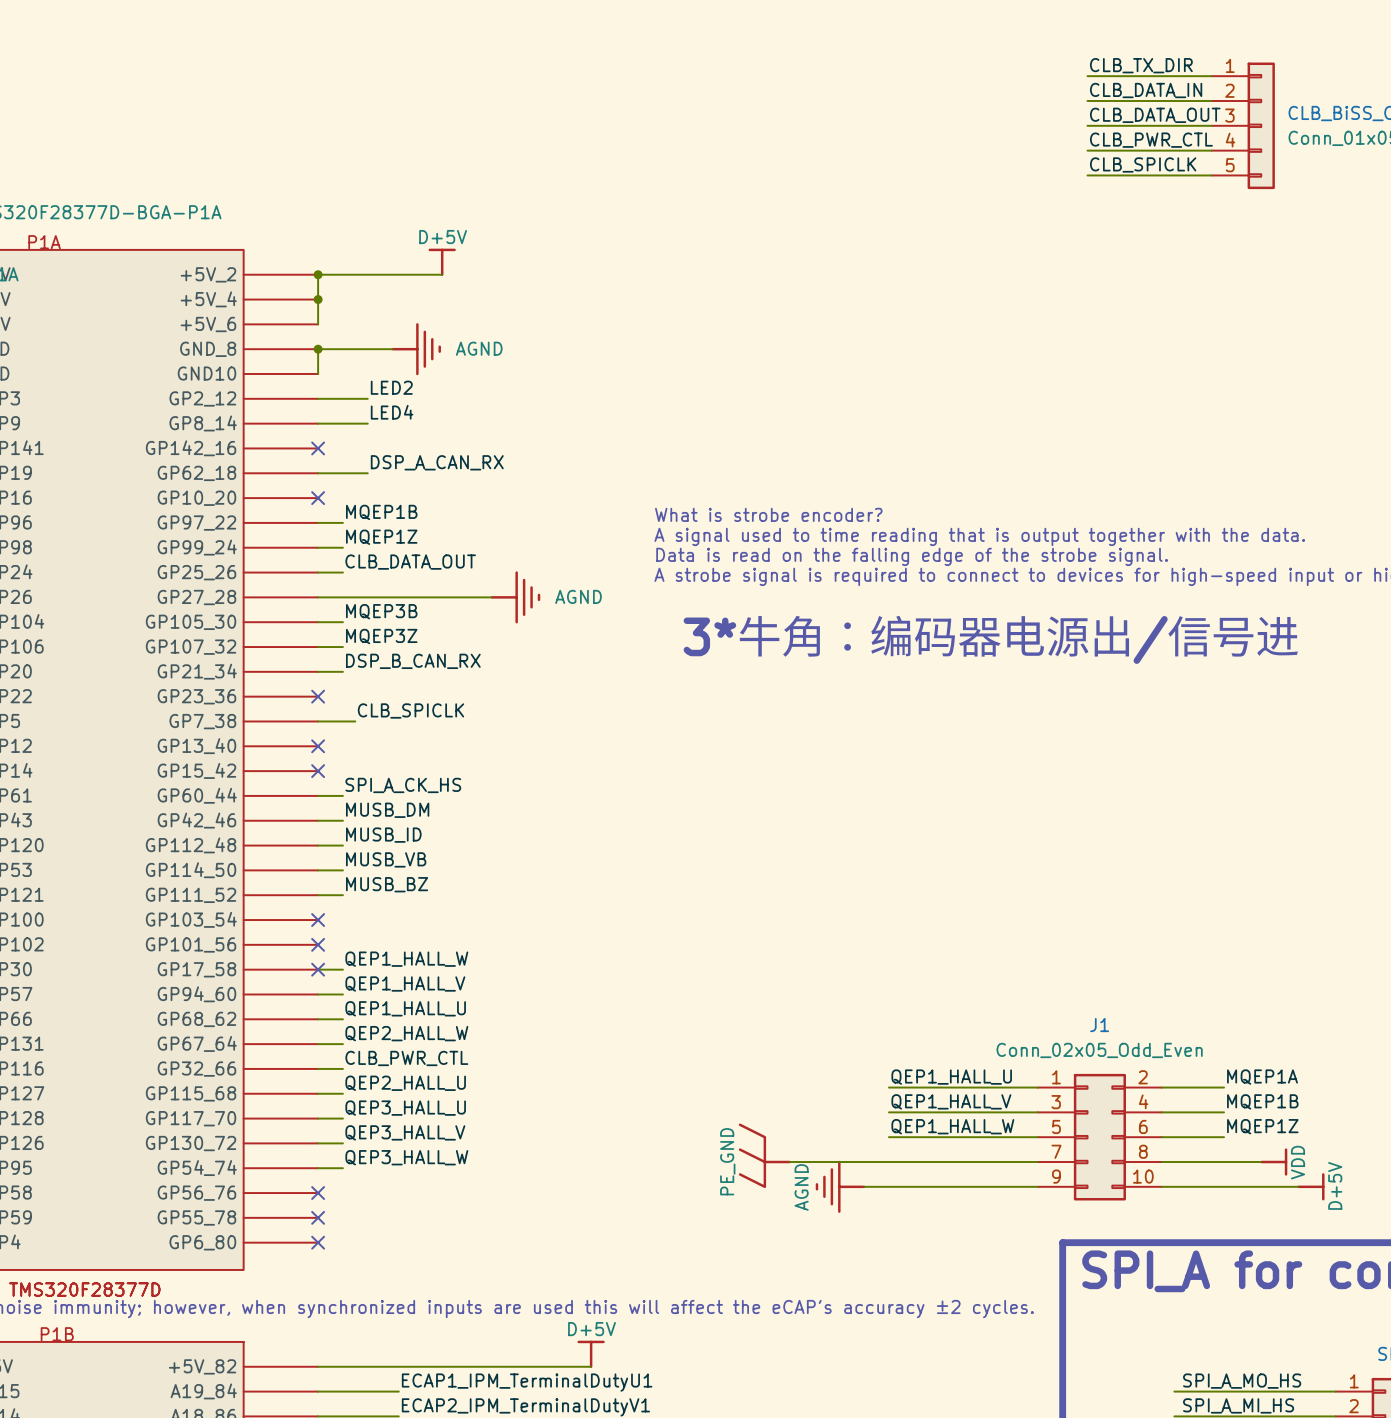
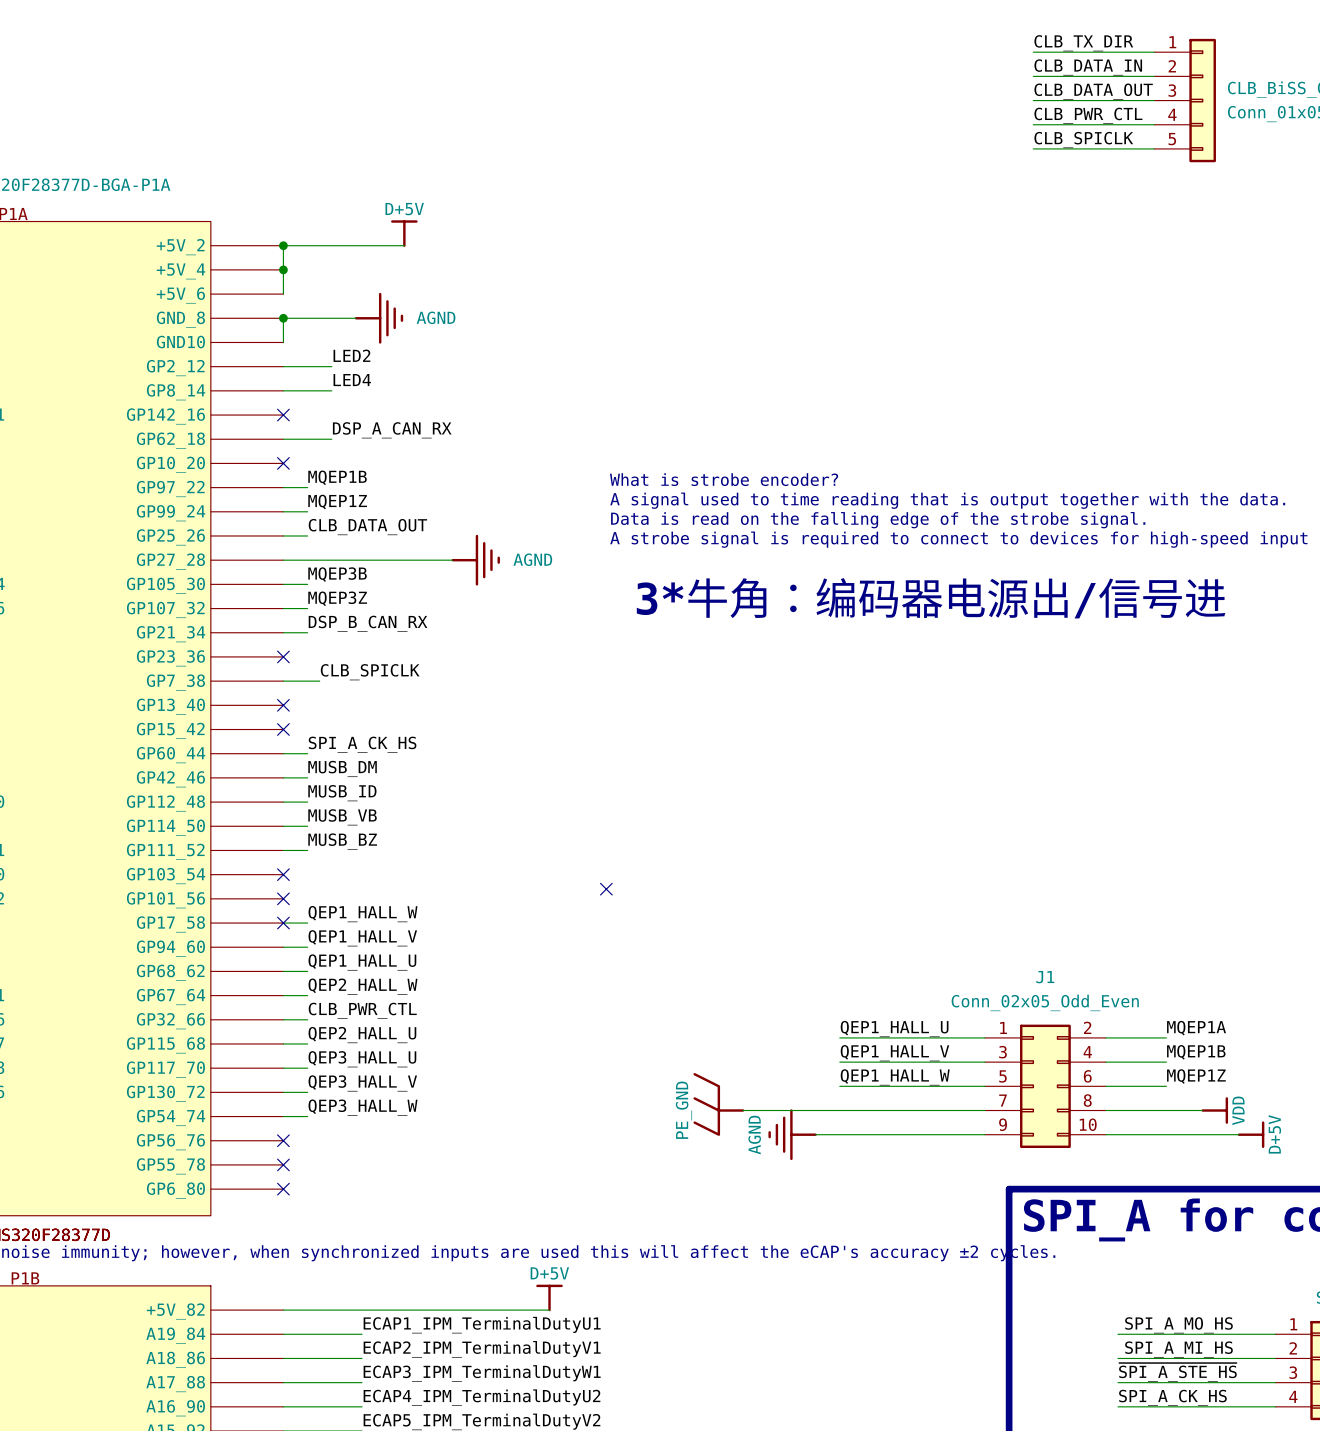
no-connect mark: none -> (606, 889)

